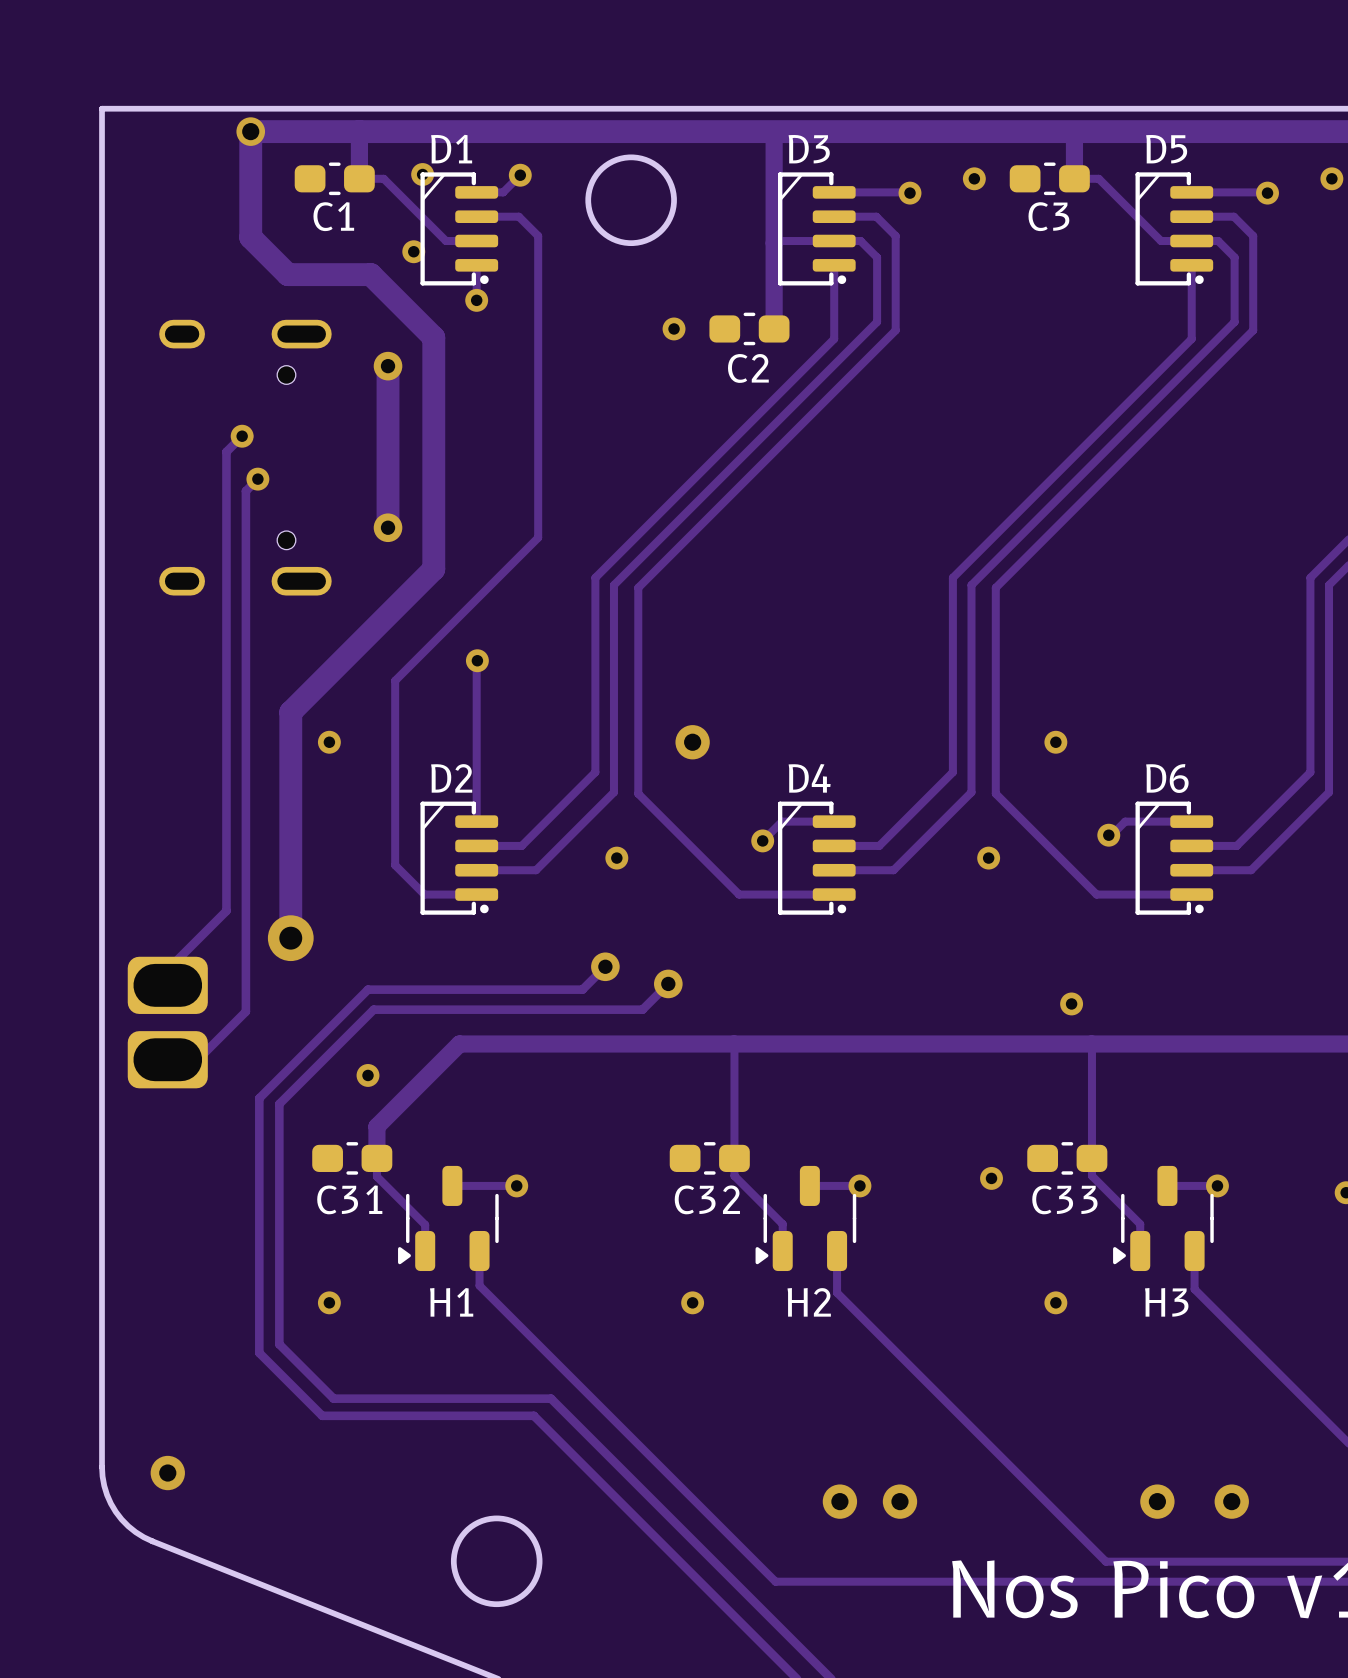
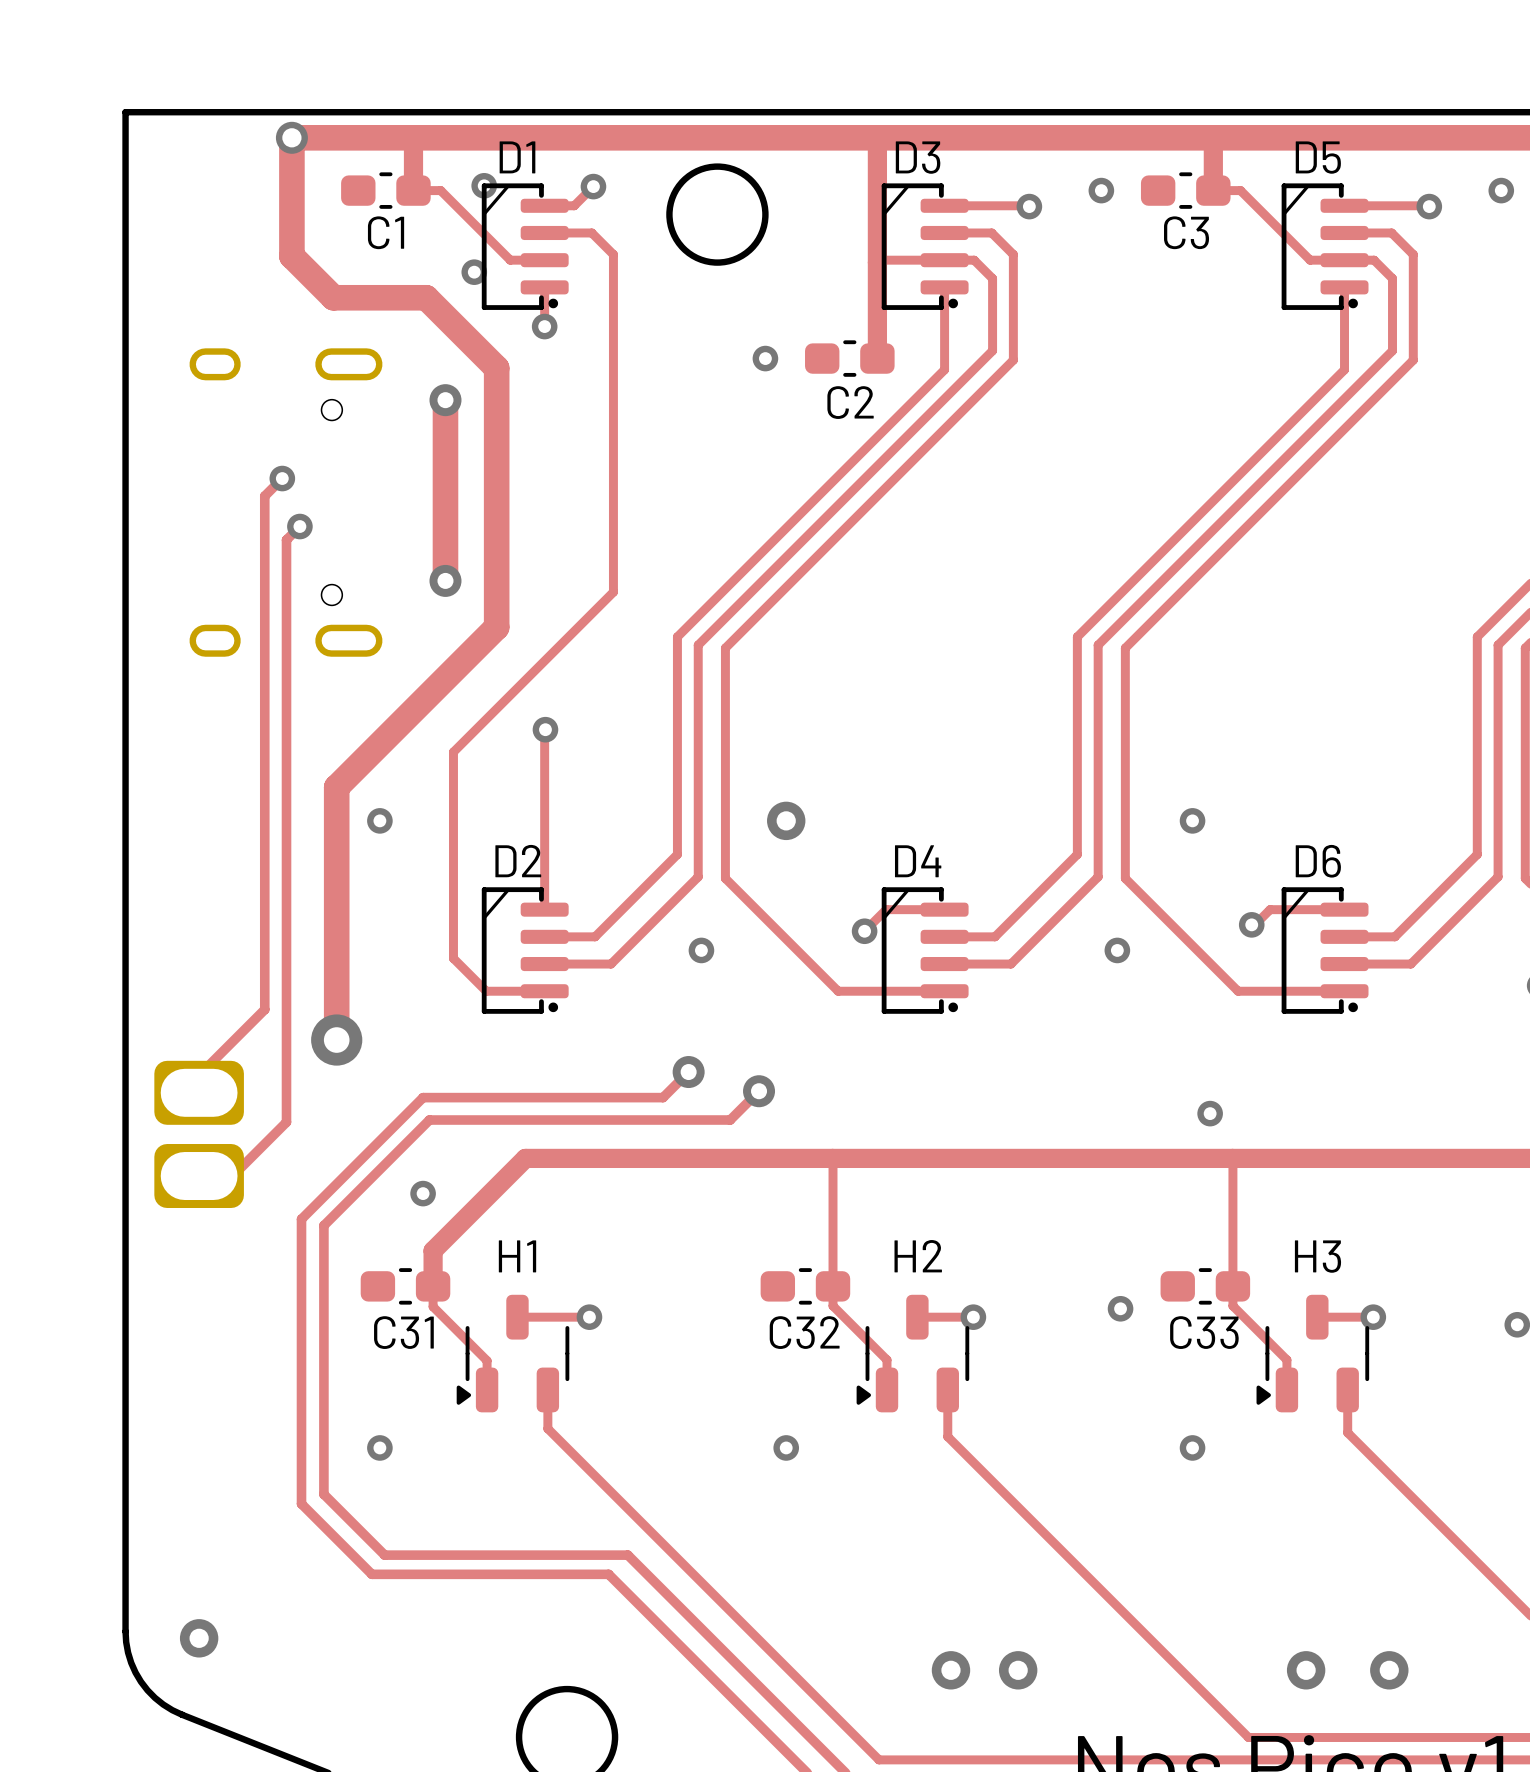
H1 name position: H1 (451, 1302) -> H1 (517, 1256)
H2 name position: H2 (809, 1302) -> H2 (918, 1256)
H3 name position: H3 (1166, 1302) -> H3 (1317, 1256)

